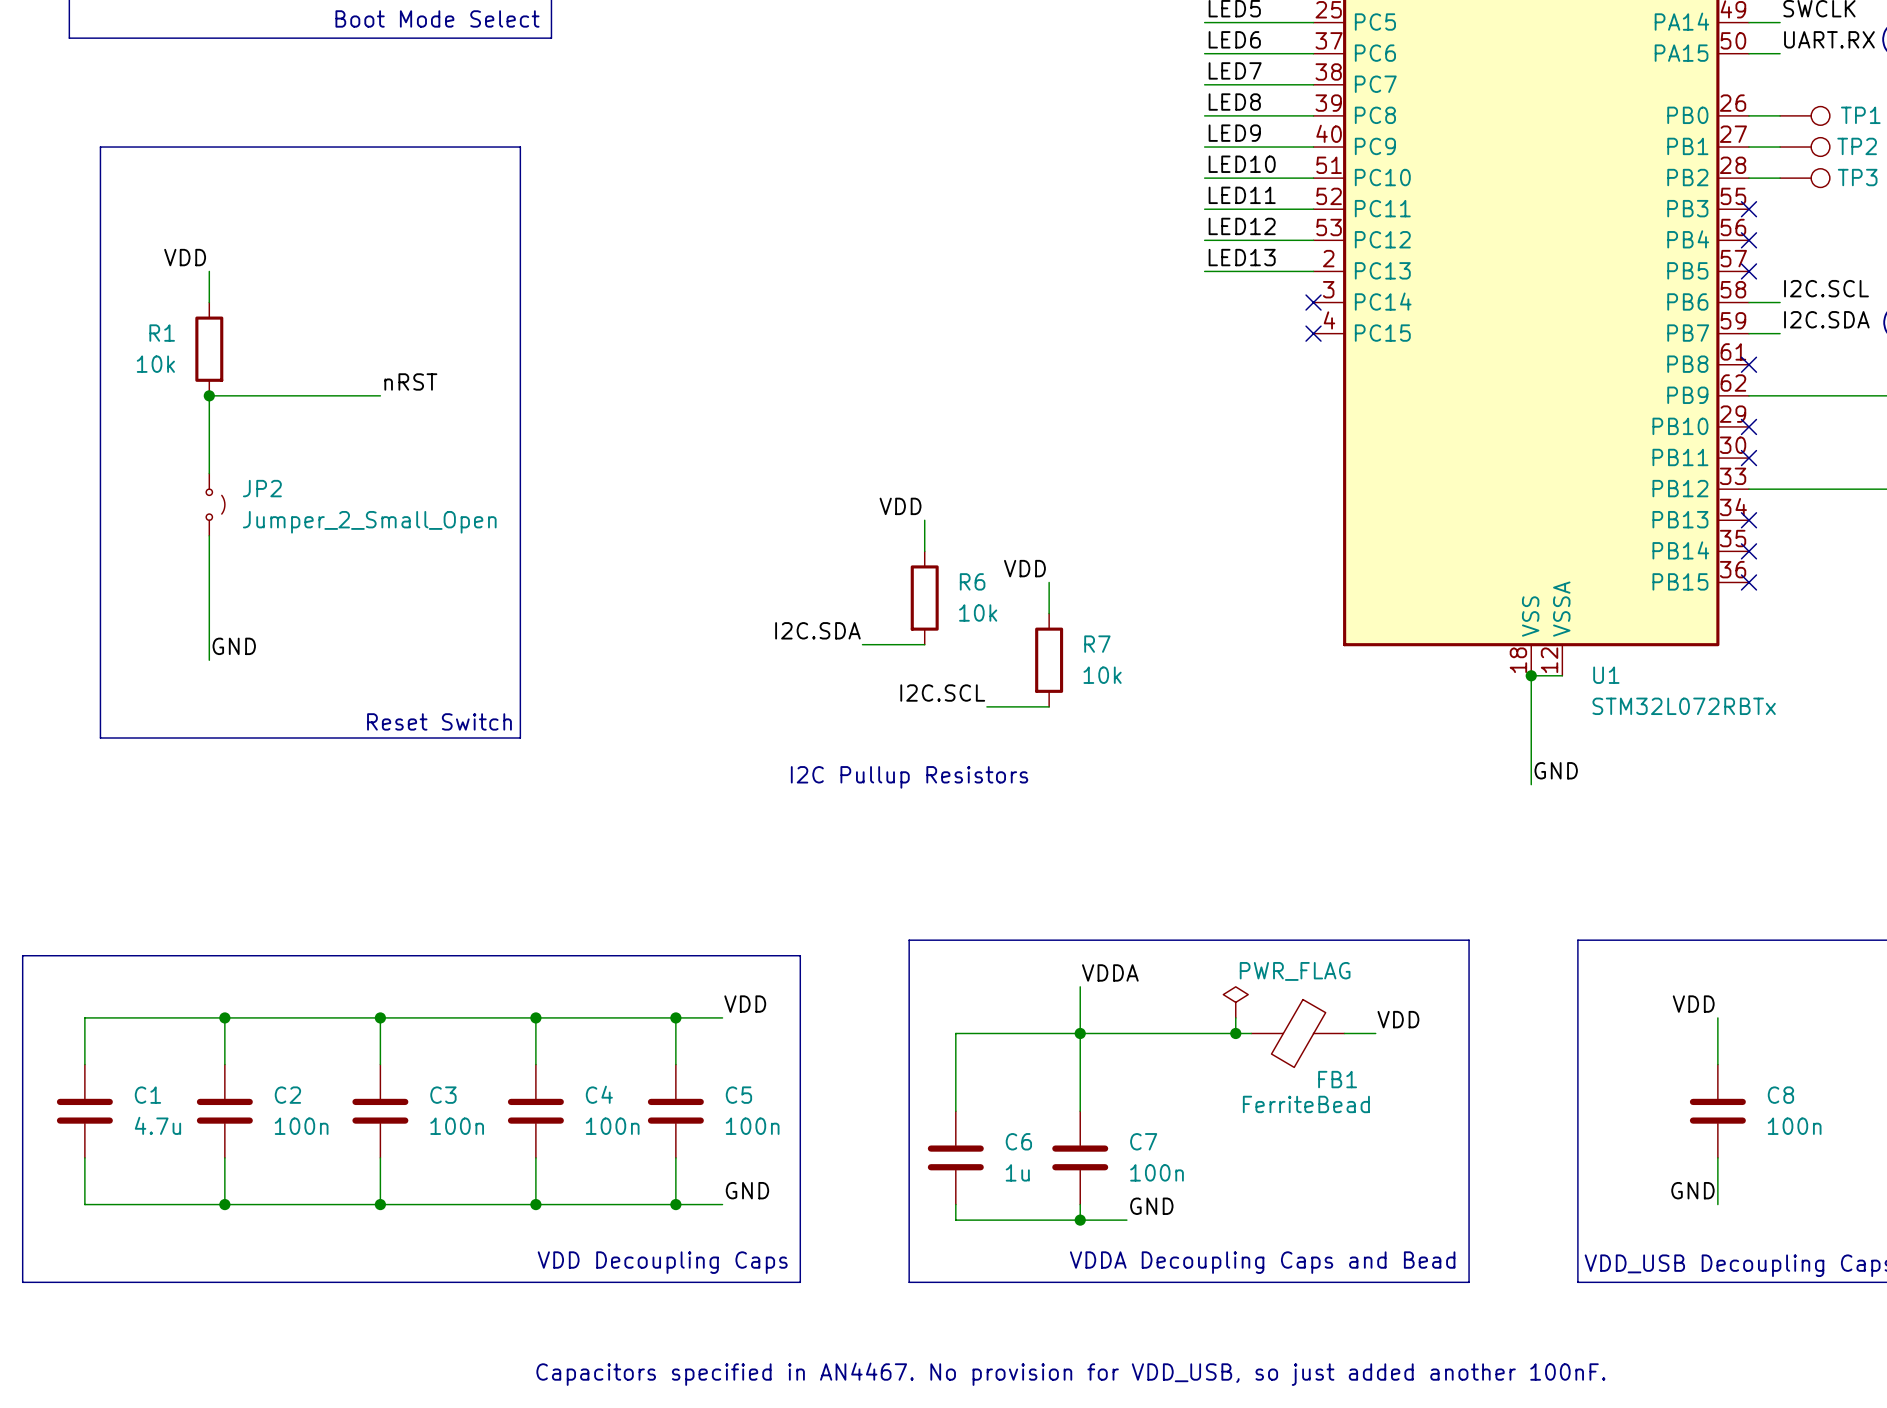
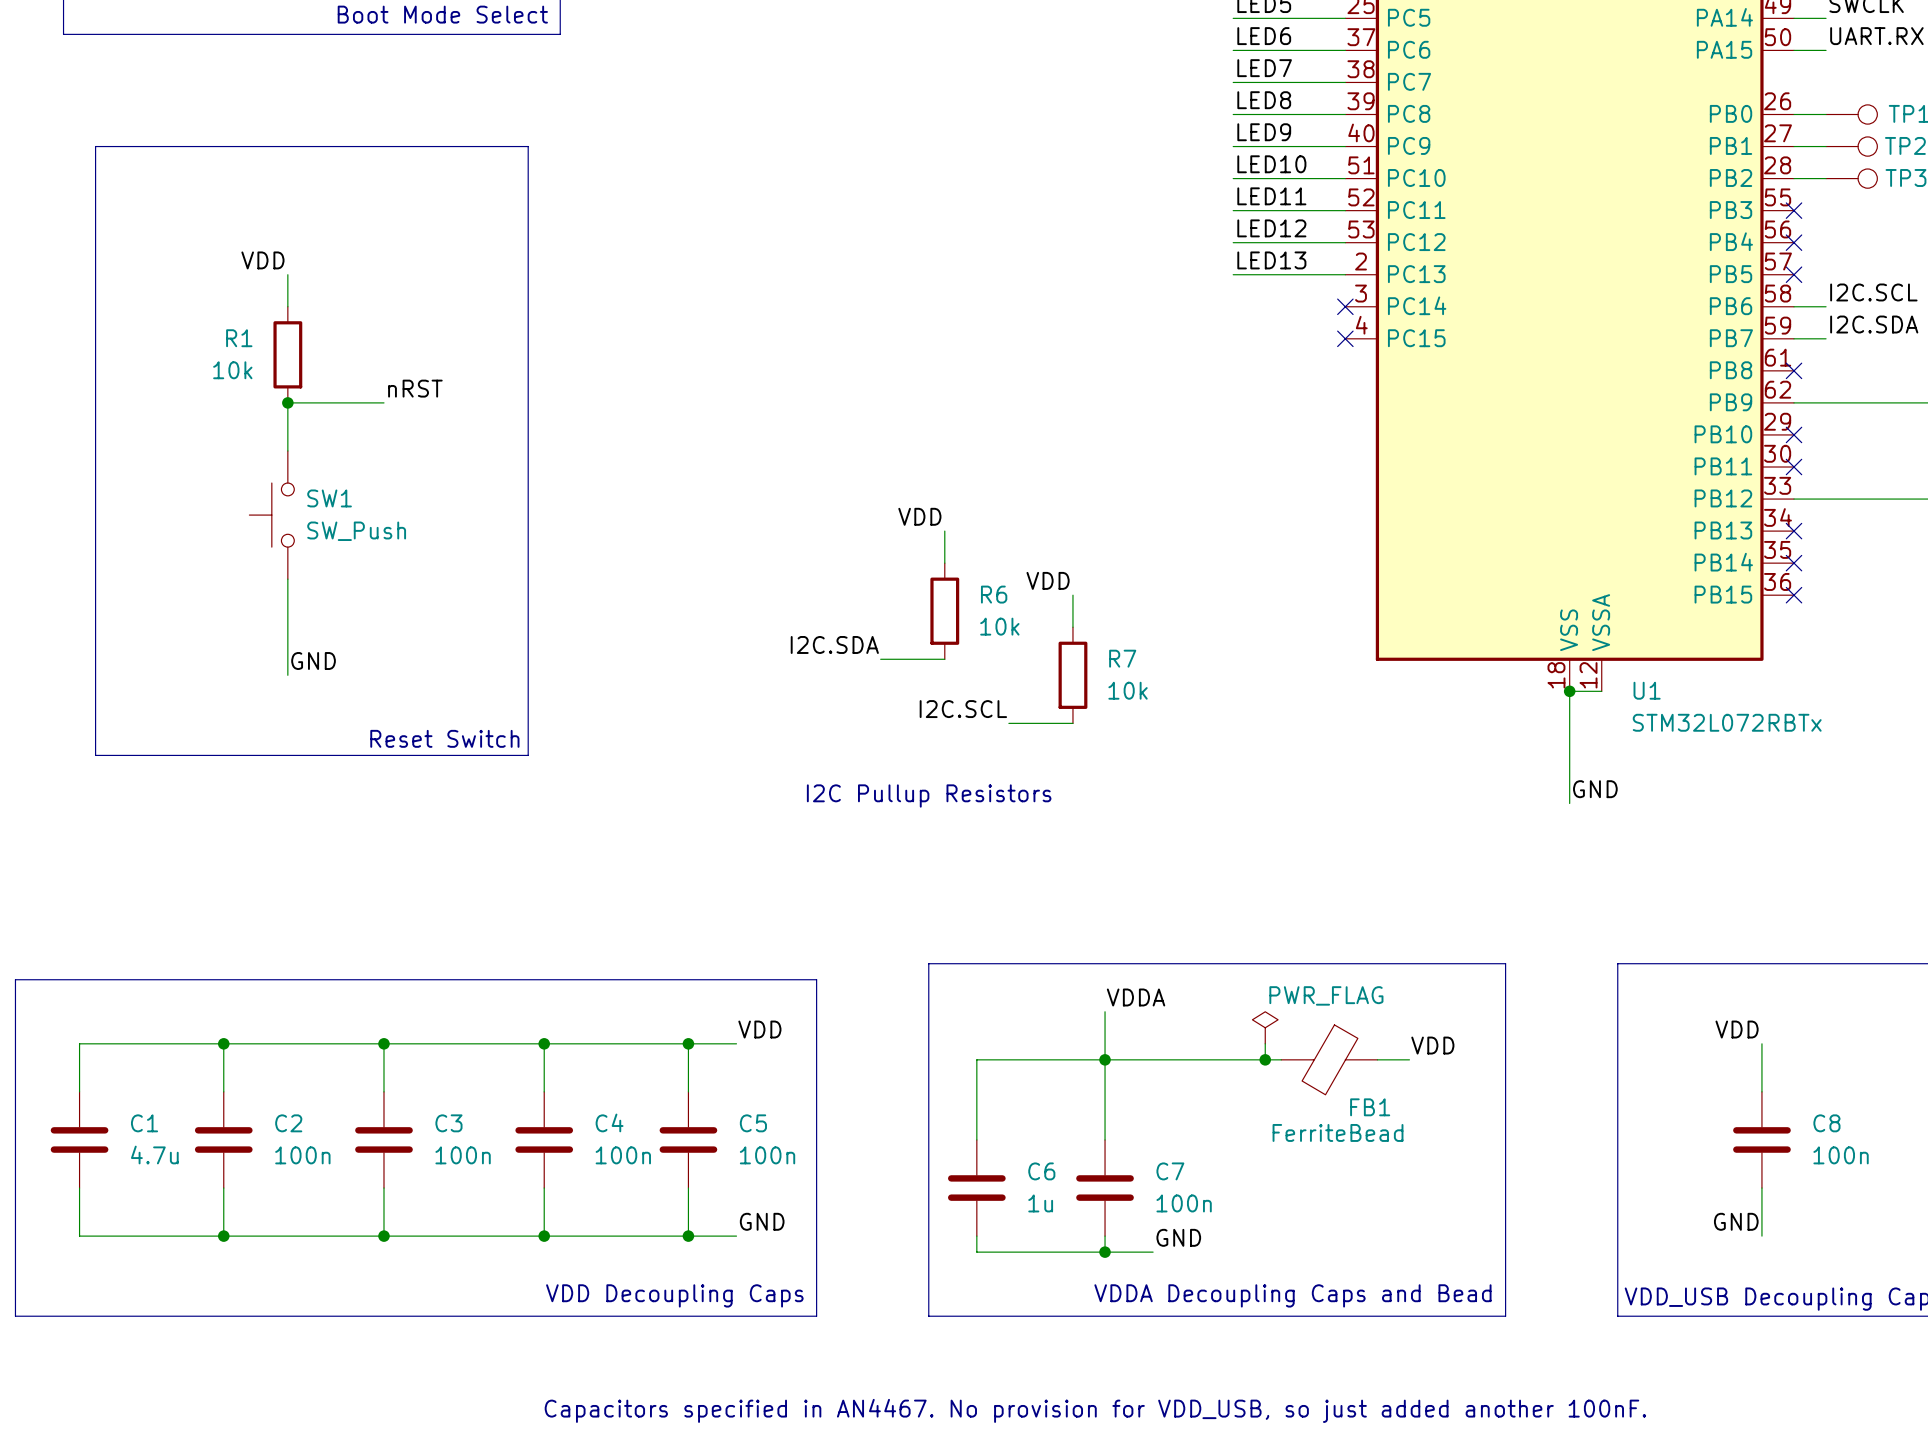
label position: VDD (185, 257) -> VDD (262, 260)
wire: (209, 271) (209, 302) -> (287, 274) (287, 306)
R1 position: (209, 349) -> (287, 354)
junction: (209, 395) -> none
wire: (287, 395) (209, 395) (209, 473) -> (287, 402) (287, 450)
junction: none -> (287, 402)
JP2: Jumper_2_Small_Open (215, 504) -> none
SW1: none -> SW_Push (271, 515)
wire: (209, 535) (209, 660) -> none
wire: none -> (287, 579) (287, 675)
label position: GND (234, 646) -> GND (313, 661)

